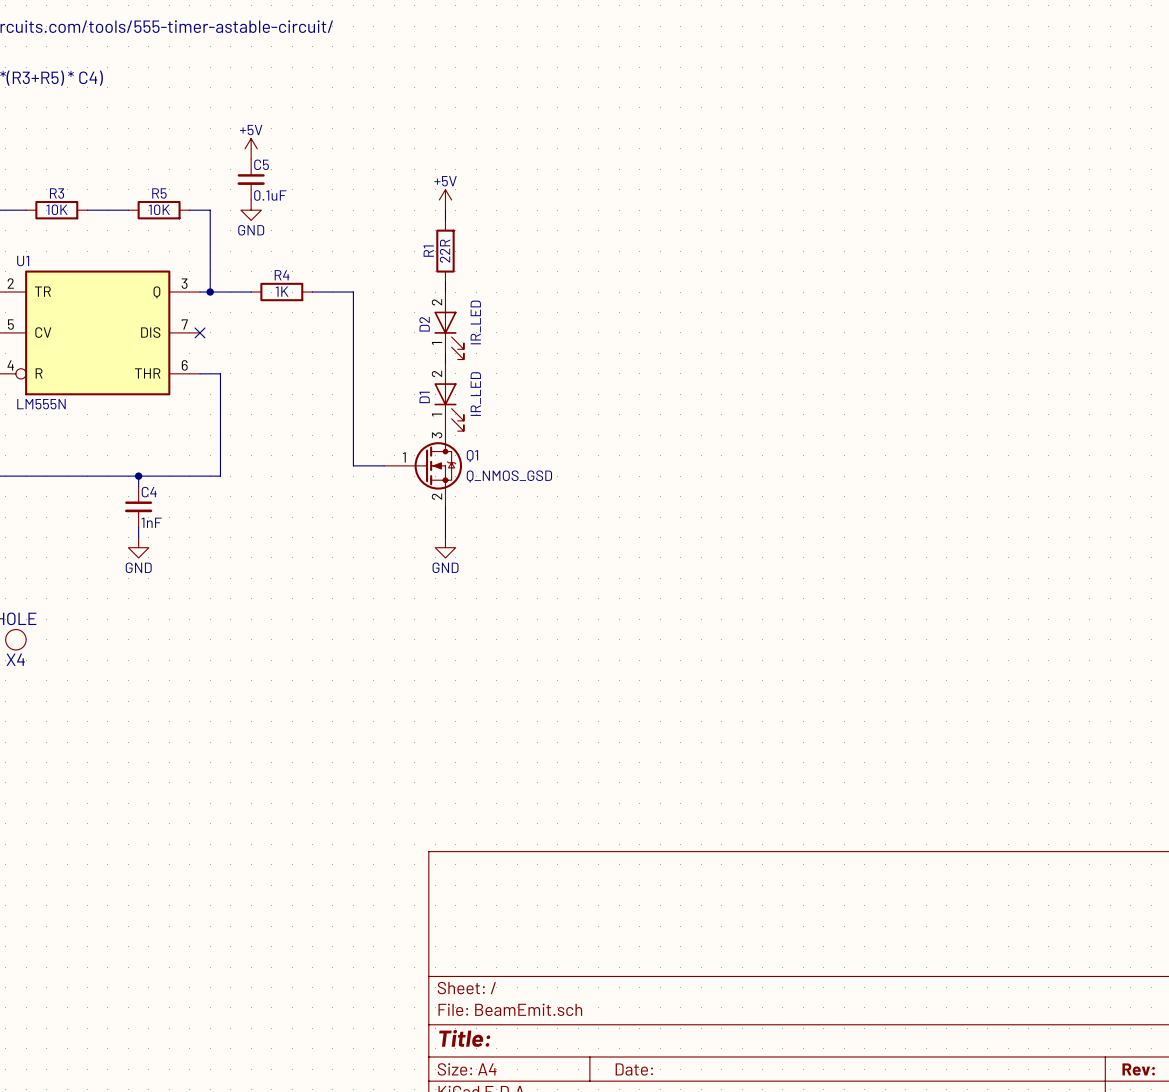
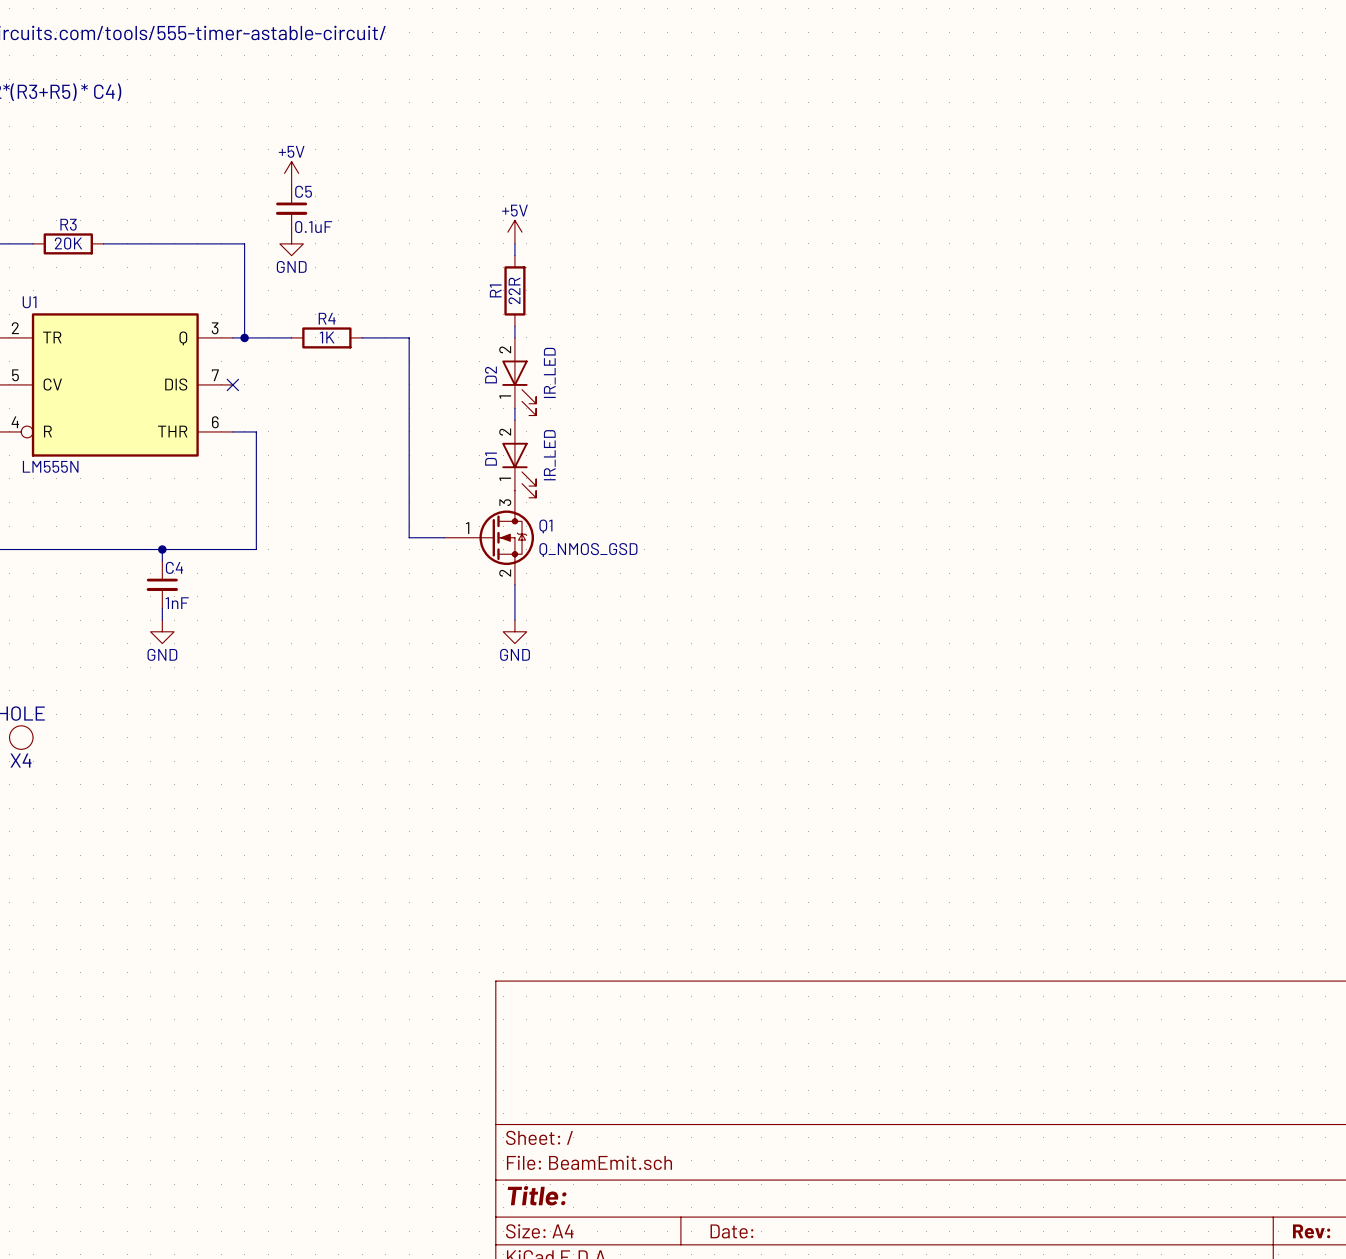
R3 value: 10K (57, 209) -> 20K (68, 243)
wire: none -> (150, 243) (221, 243)
R5: 10K (159, 210) -> none

